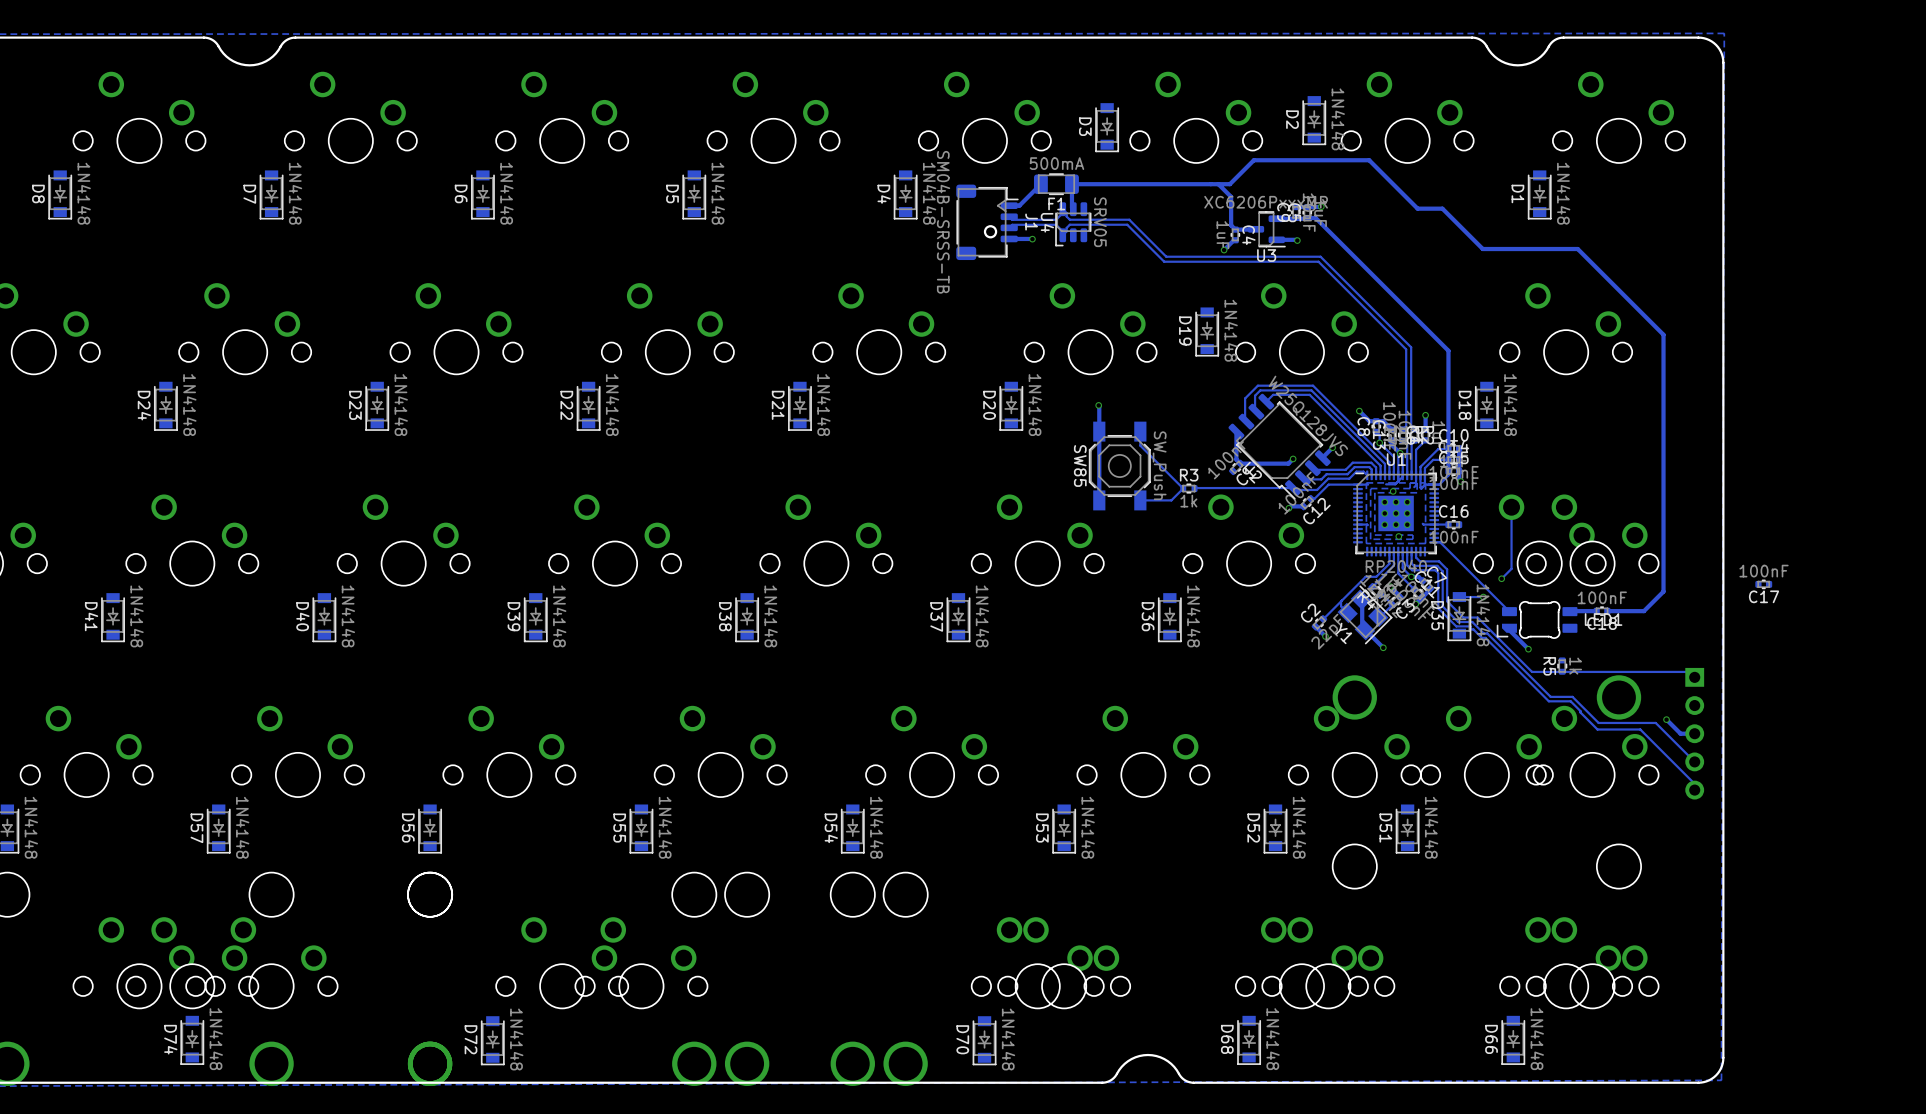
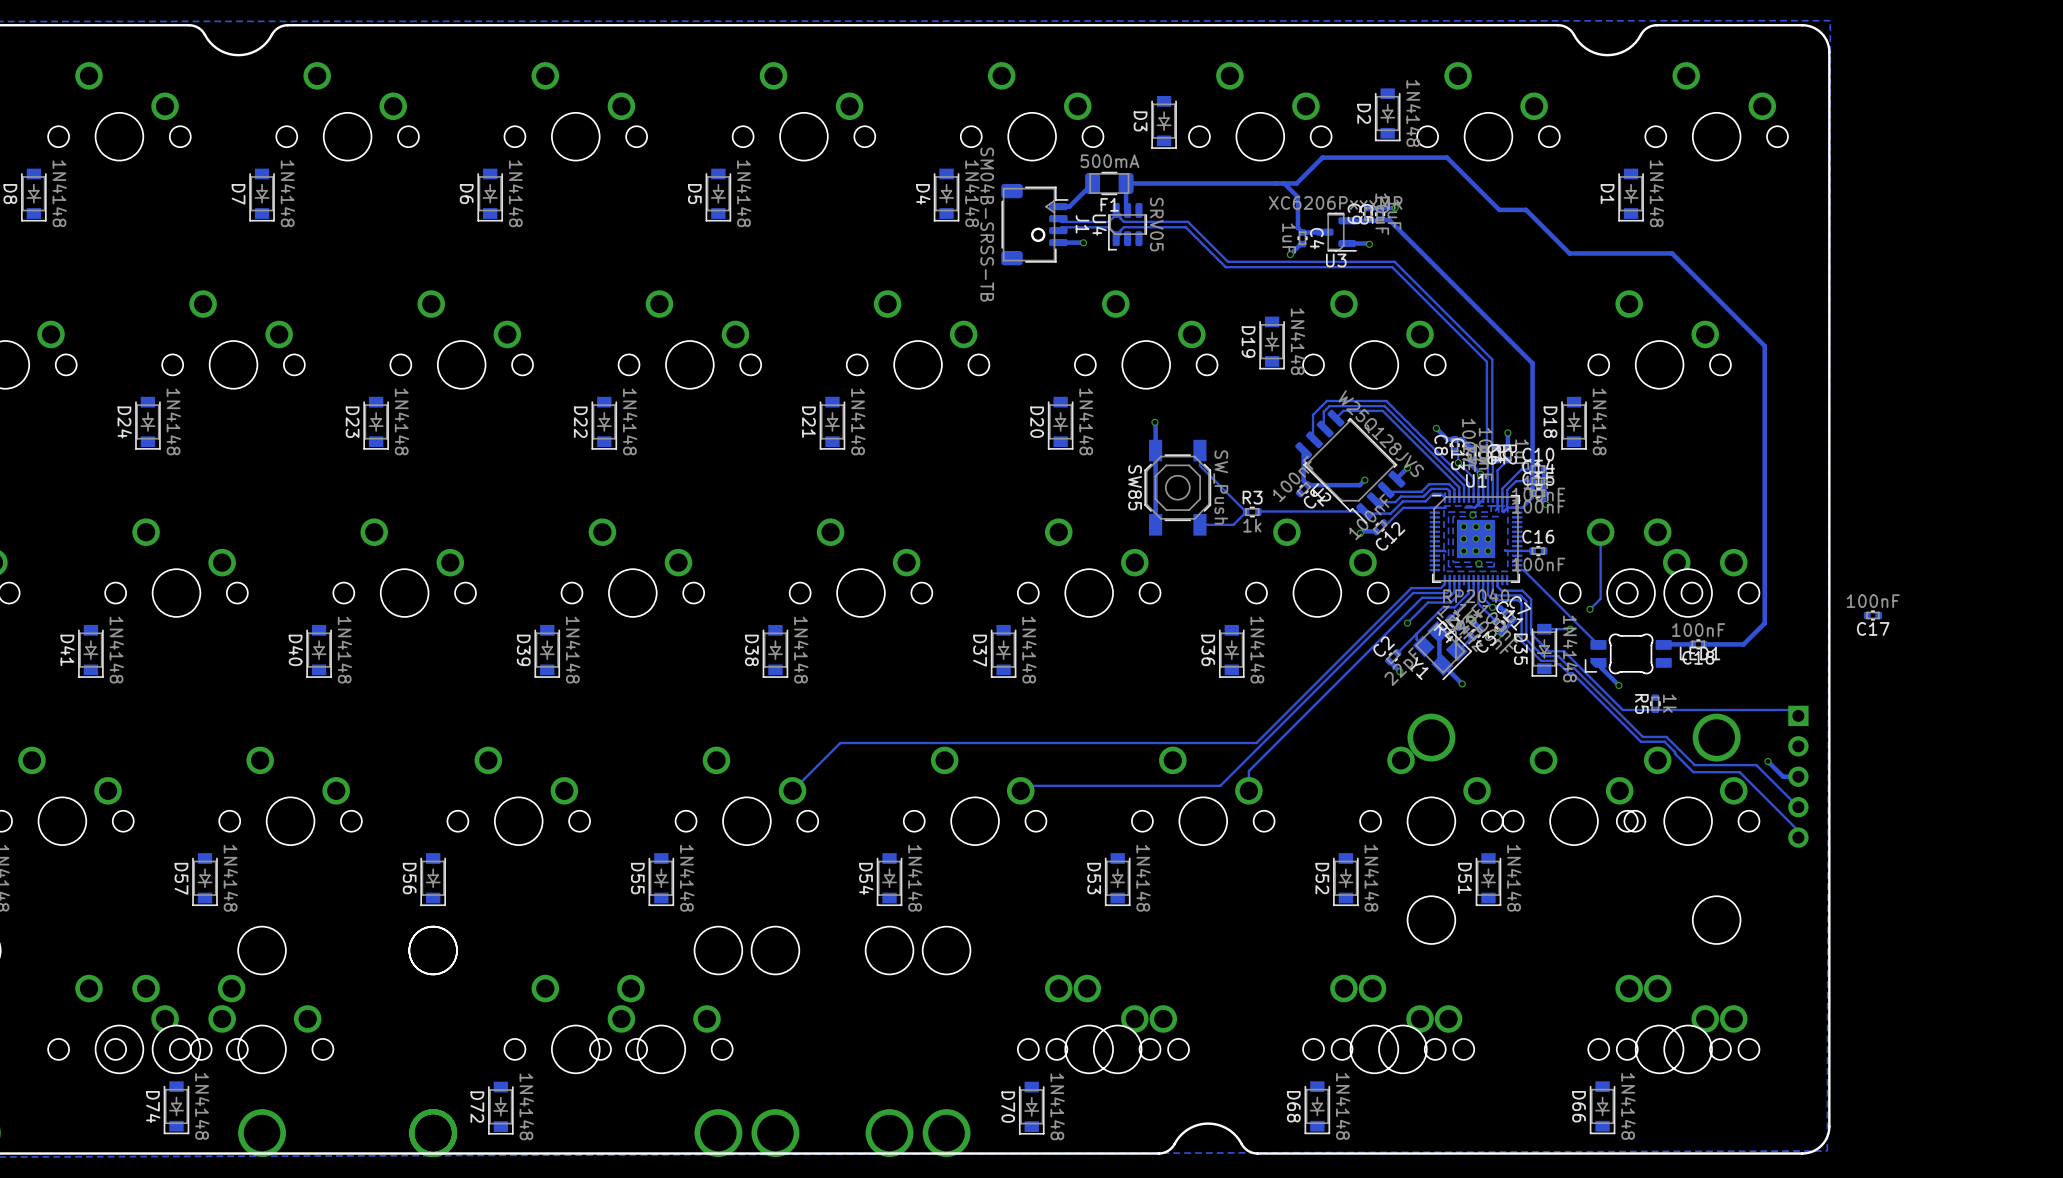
track: none -> (1444, 580) (1444, 584) (1440, 588) (1411, 588) (1256, 743) (840, 743) (792, 790)
track: none -> (1449, 580) (1449, 590) (1446, 592) (1413, 592) (1220, 785) (1025, 785)
track: none -> (1454, 580) (1454, 592) (1448, 597) (1422, 597) (1248, 771) (1248, 790)
track: none -> (1459, 580) (1459, 594) (1450, 602) (1428, 602) (1407, 623)
via: none -> (1407, 623)

